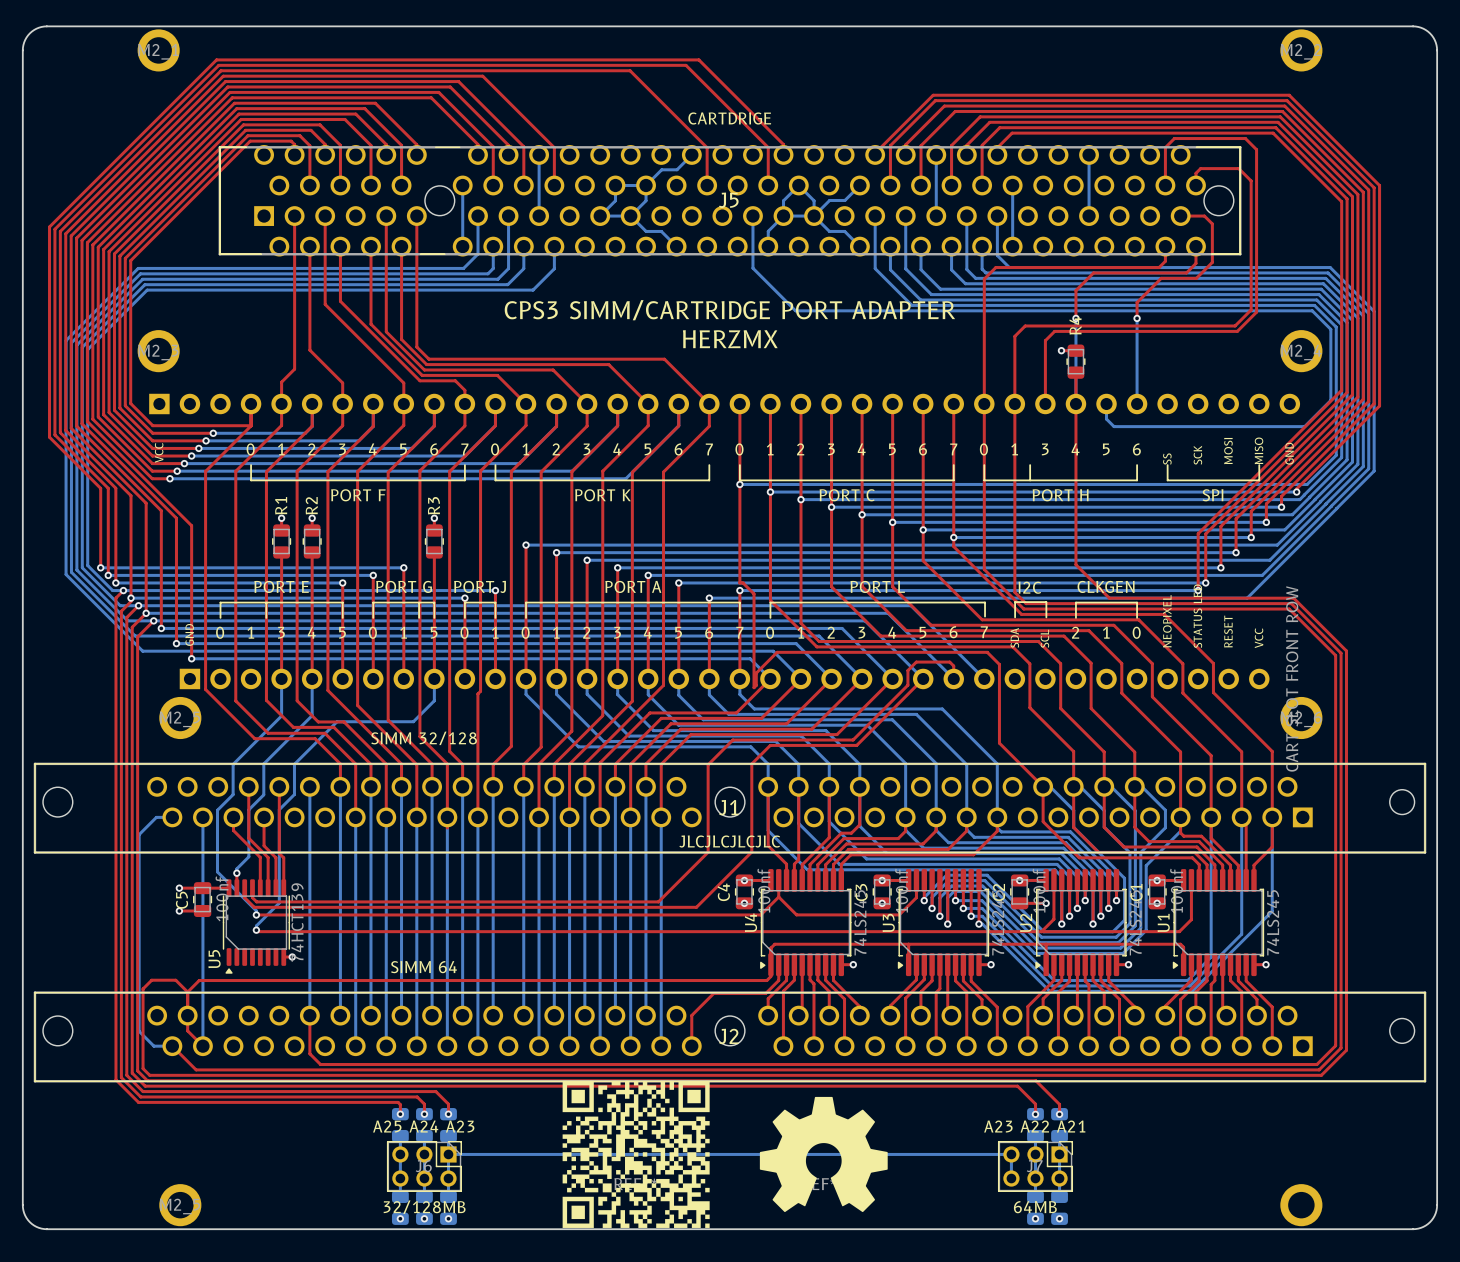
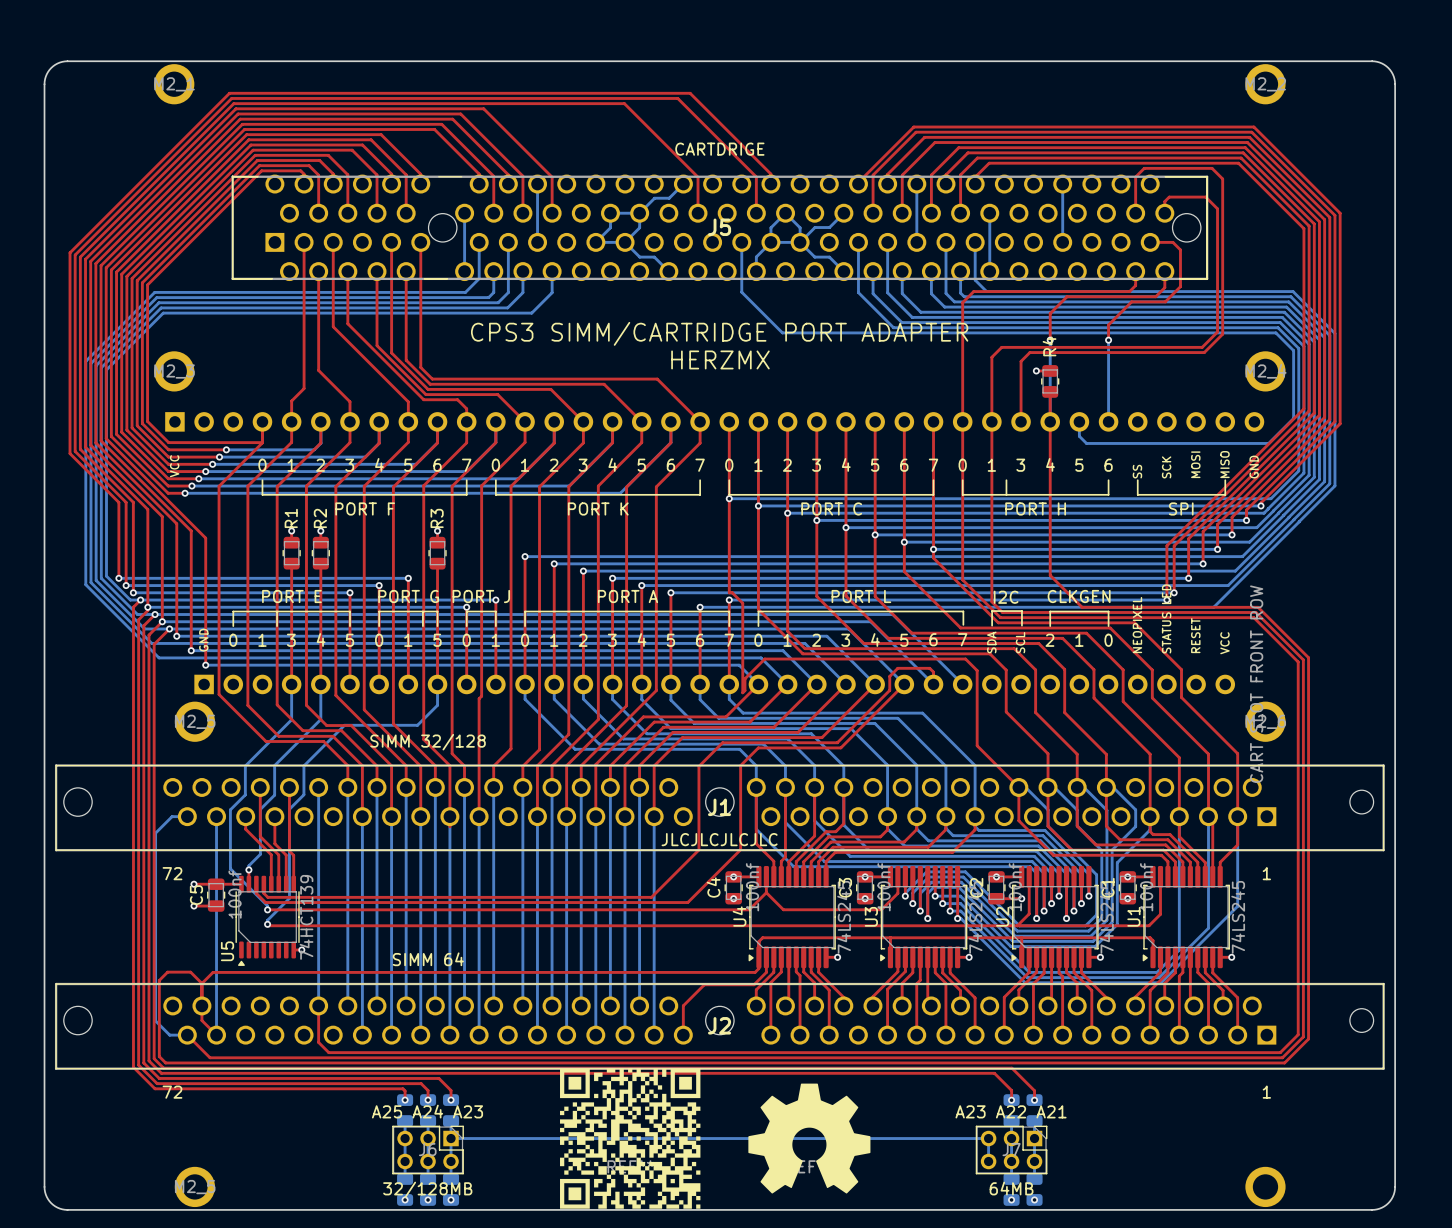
text: none -> 72 (172, 873)
text: none -> 1 (1266, 873)
text: none -> 72 (172, 1092)
text: none -> 1 (1266, 1092)

